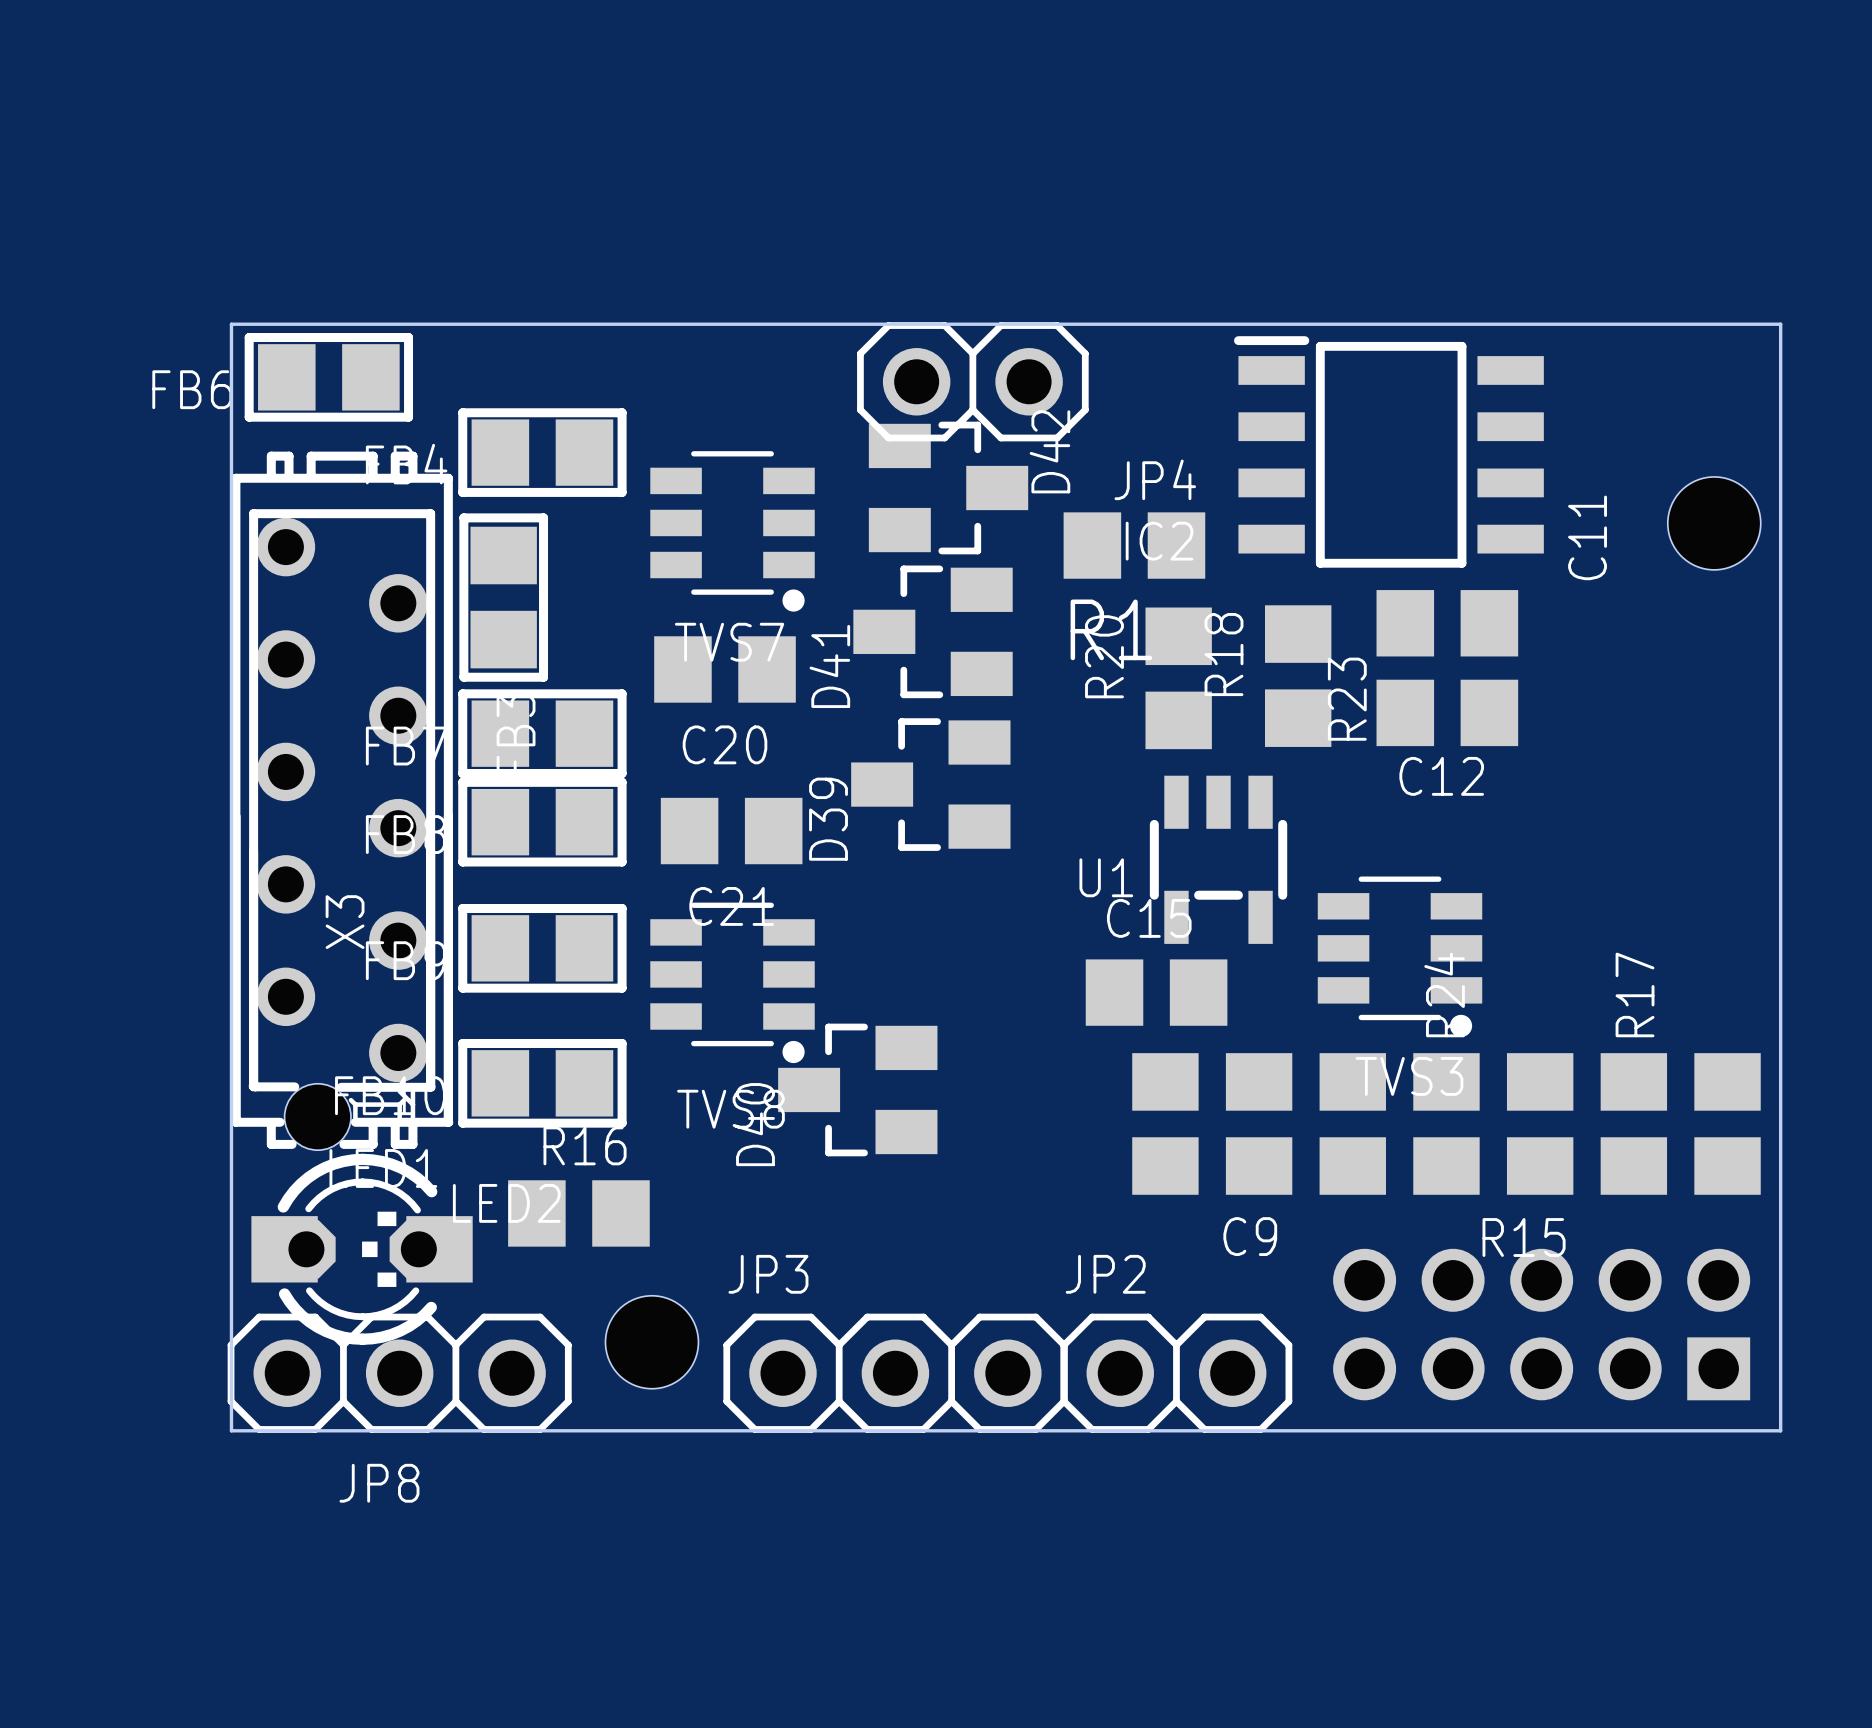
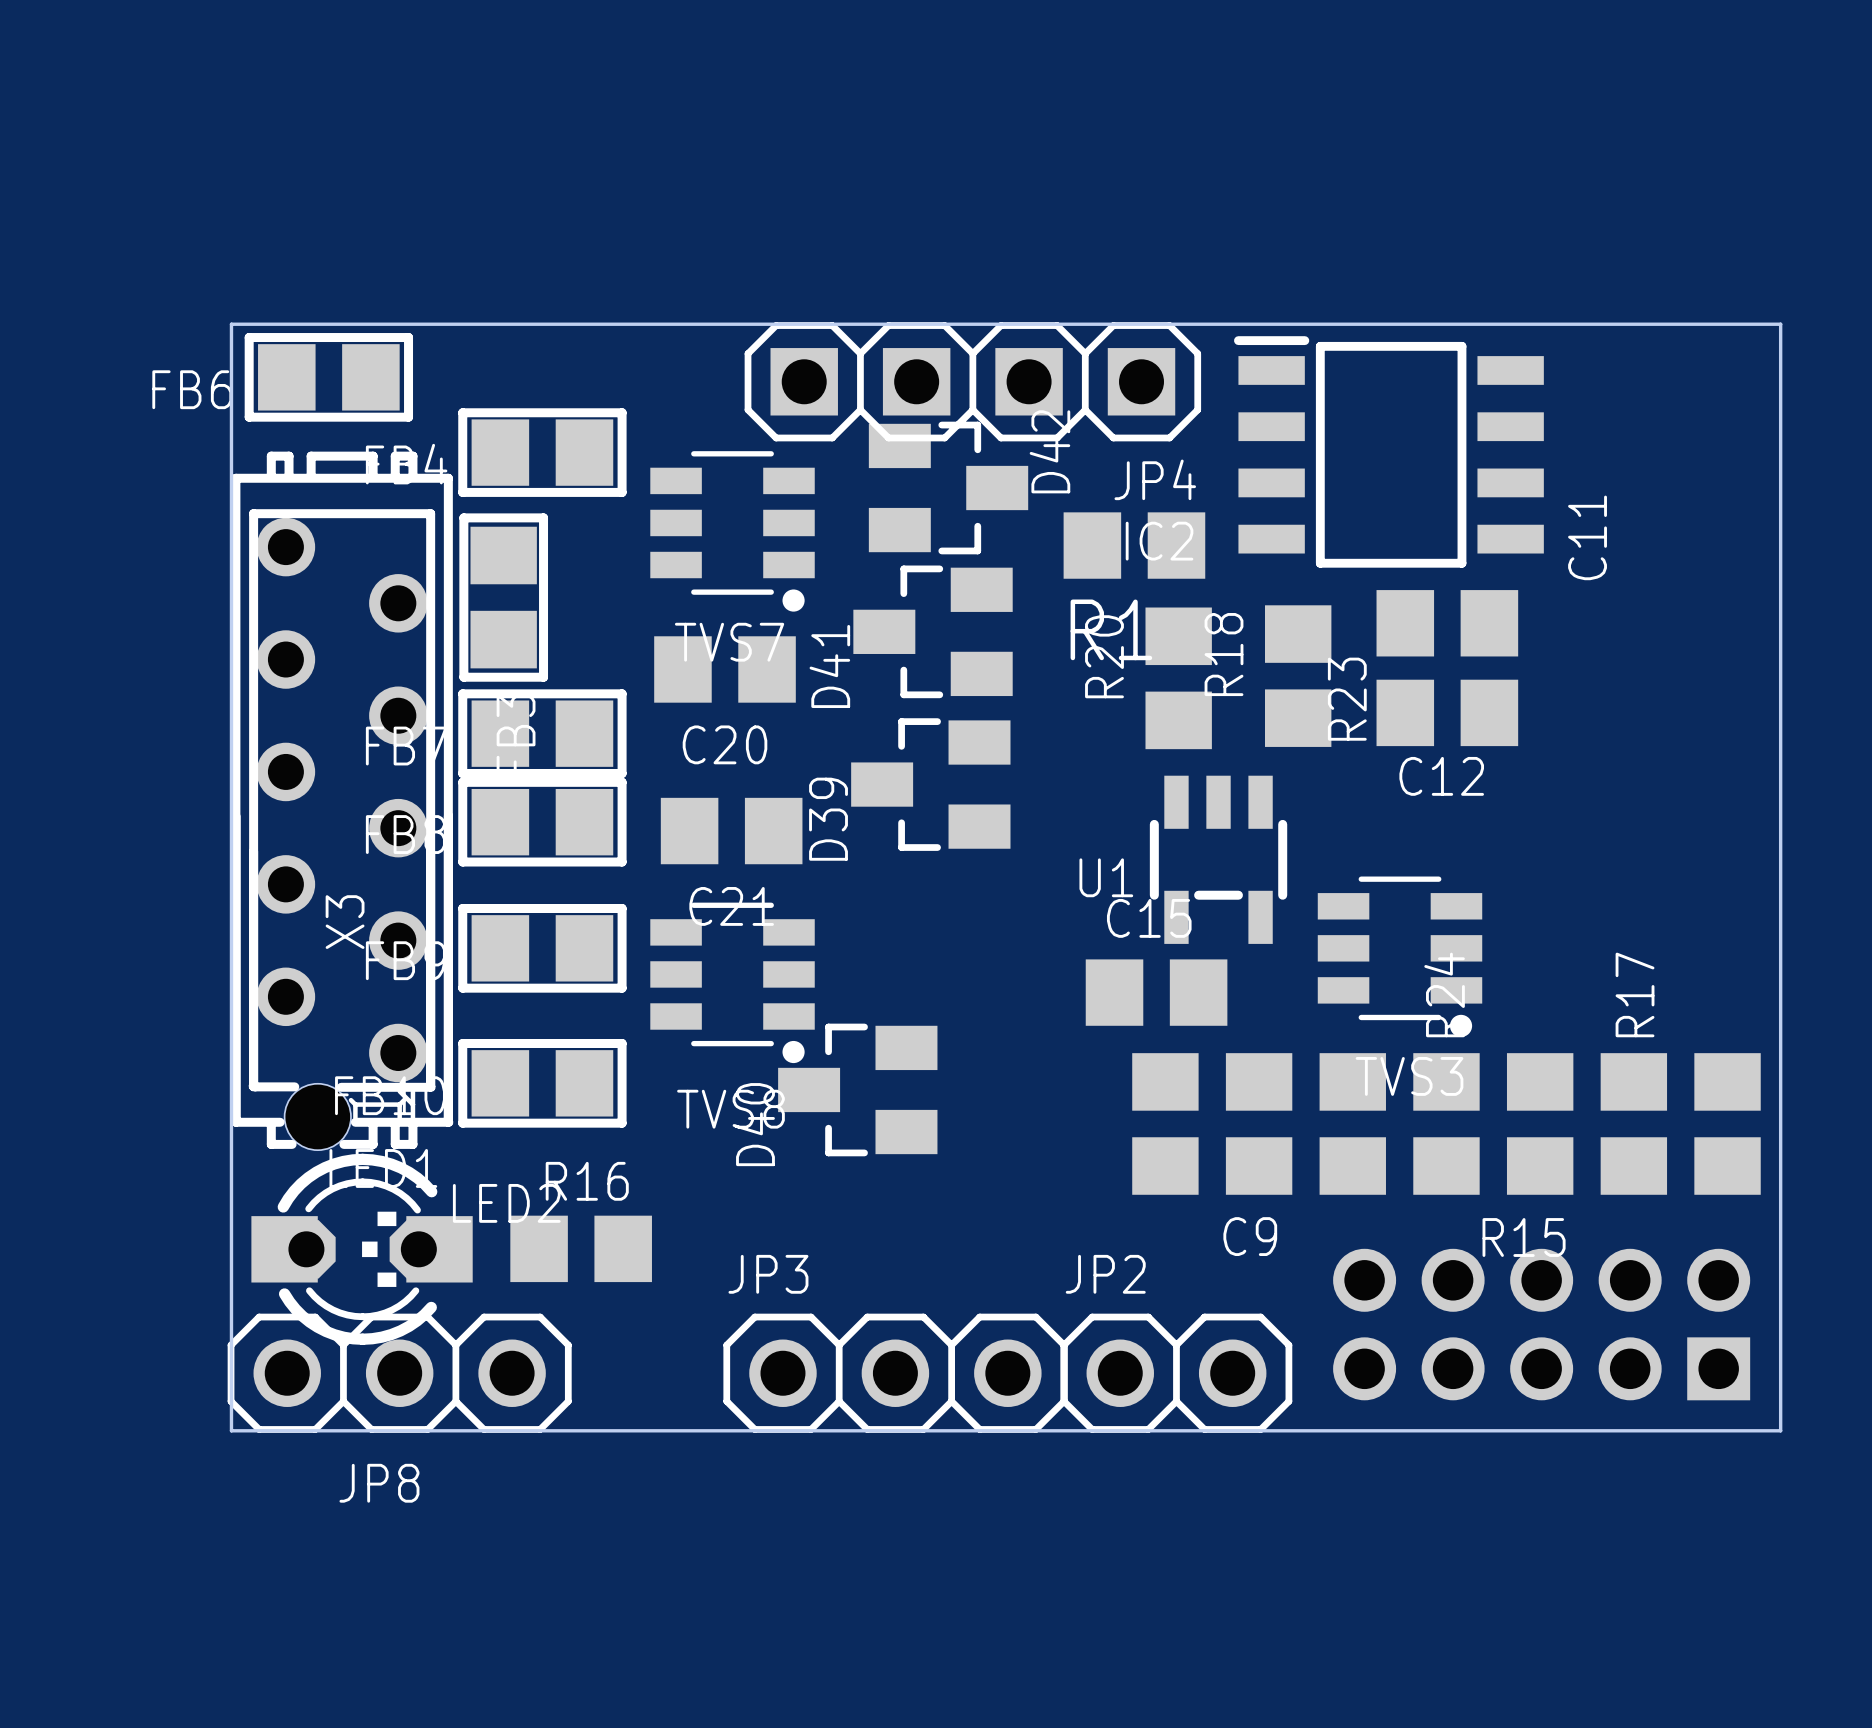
JP4 footprint: [857, 322, 1089, 442] -> [744, 322, 1202, 442]
hole: (1714, 523) -> none
R16 position: (578, 1213) -> (581, 1248)
hole: (651, 1342) -> none

